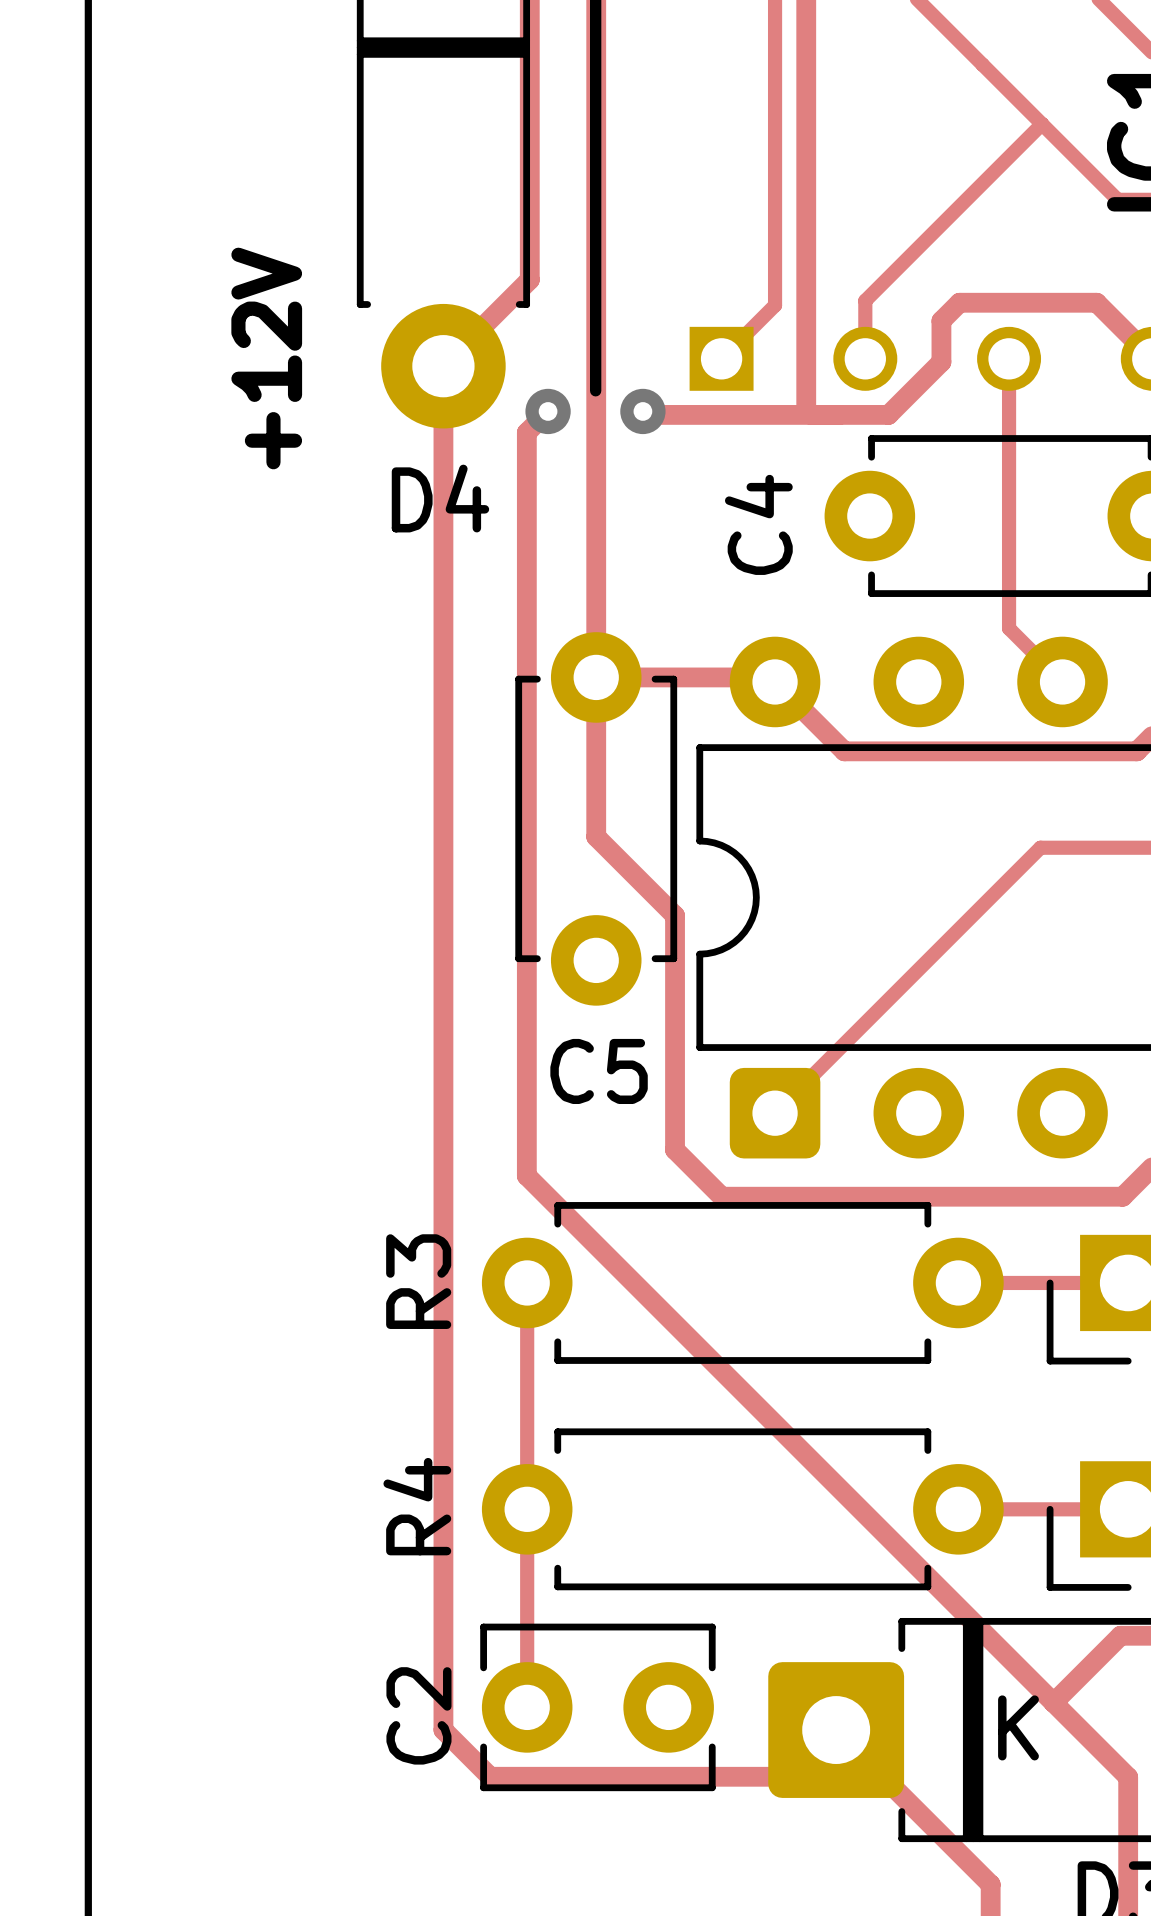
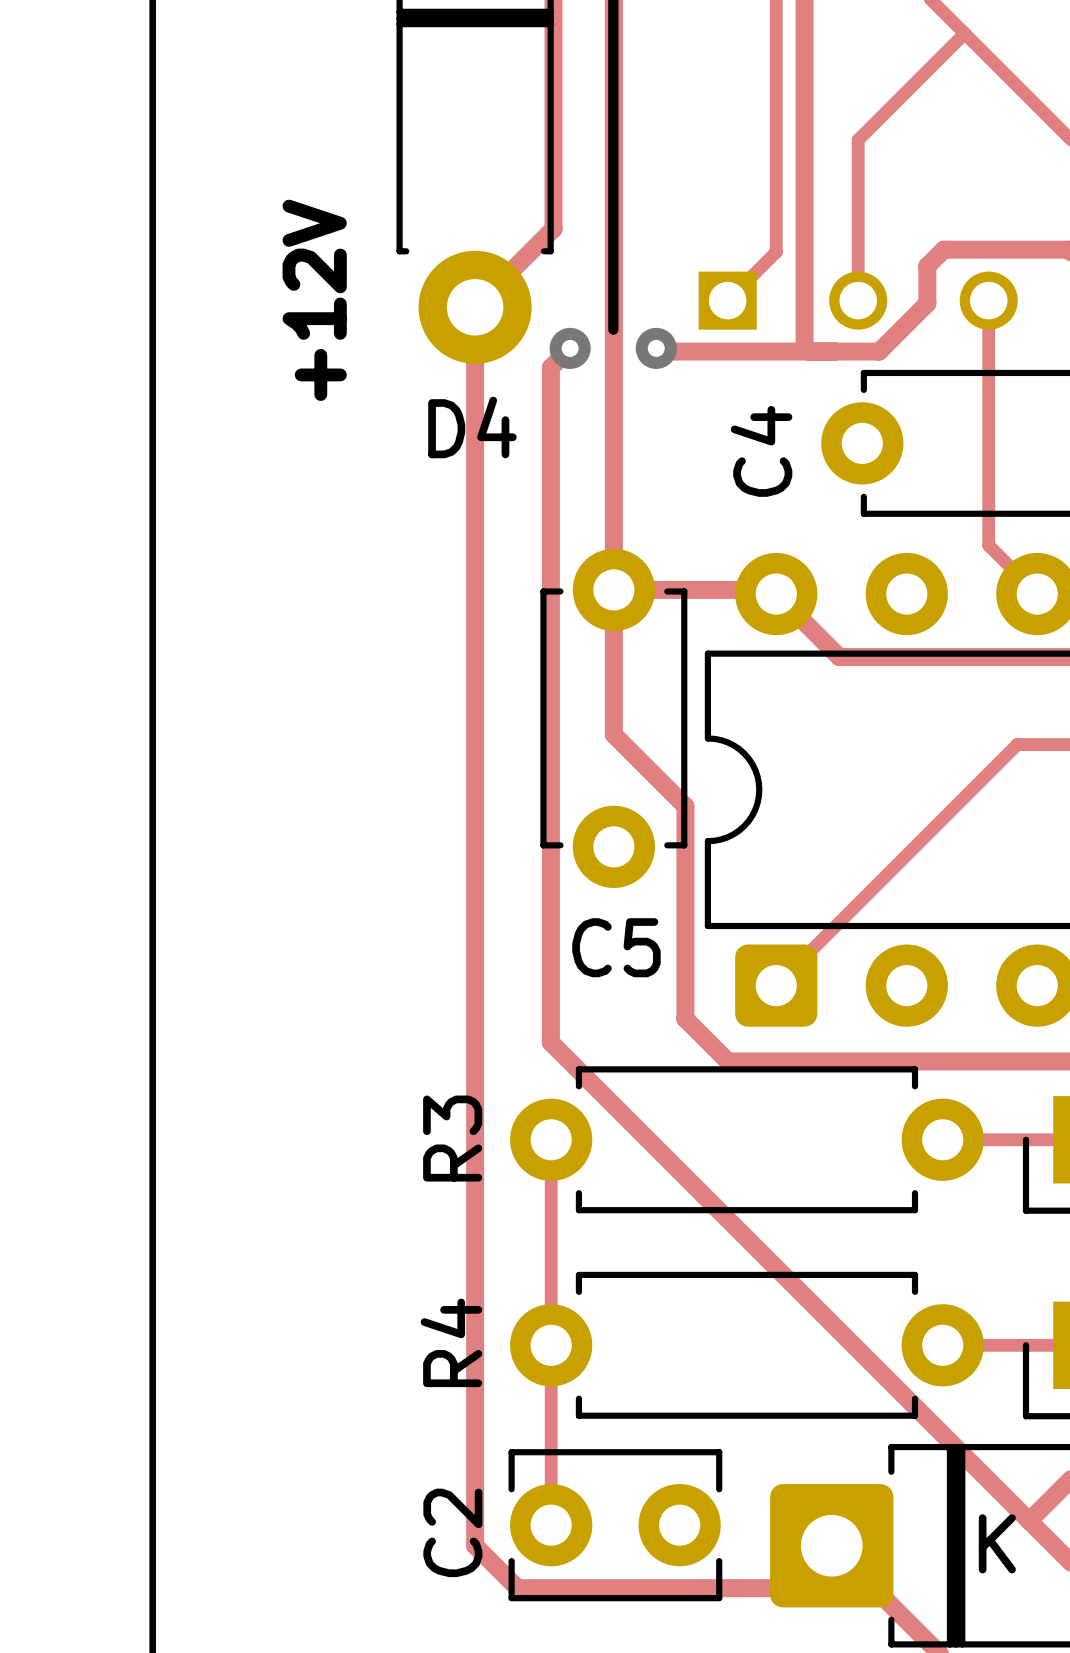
track: (1042, 124) (865, 300) -> (964, 33) (858, 140) (858, 247)

